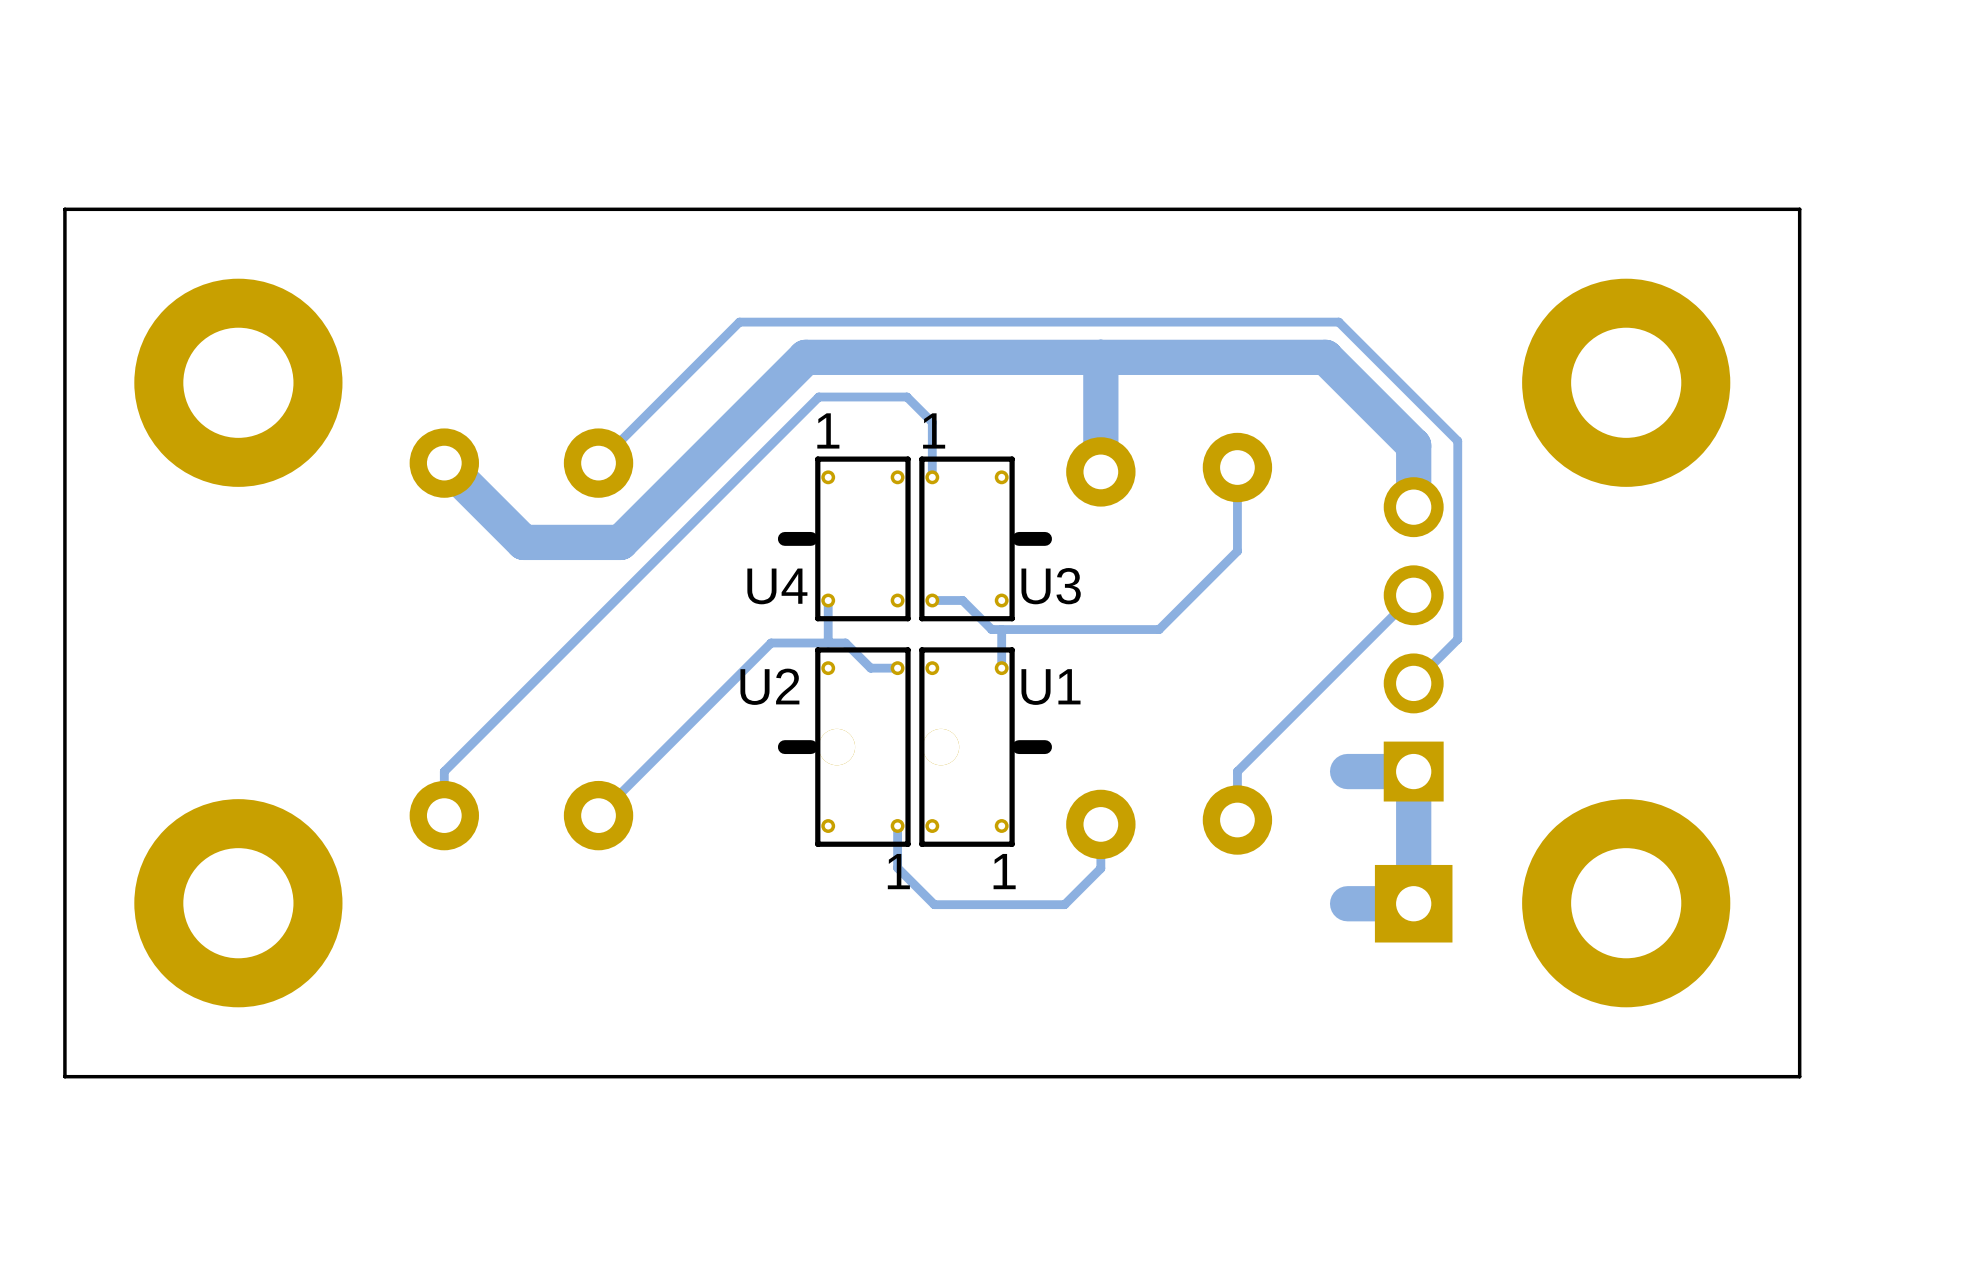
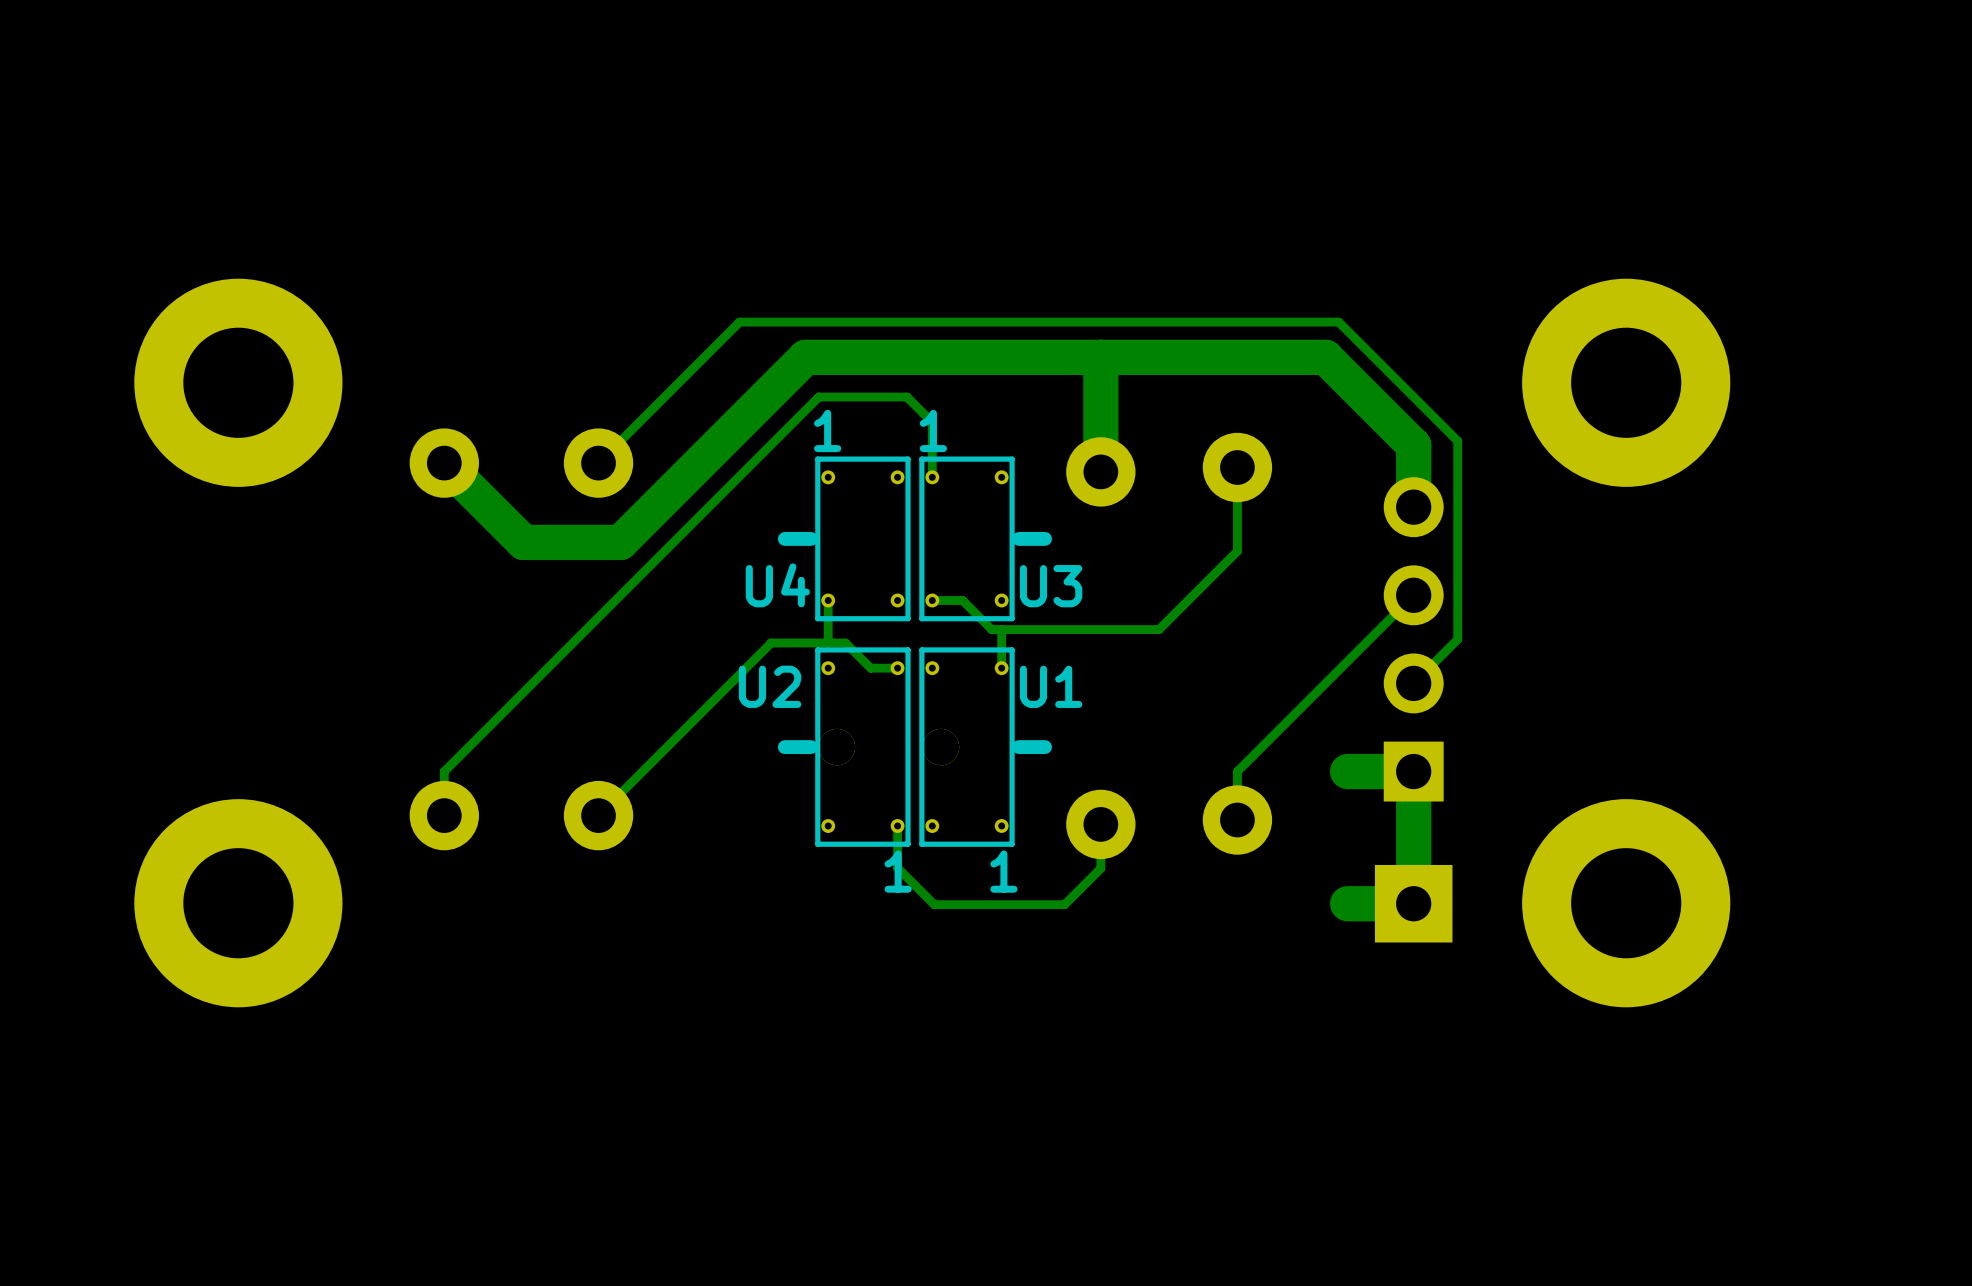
board edge: (1799, 209) (1799, 1076) (64, 1076) (64, 209) (1799, 209) -> none

